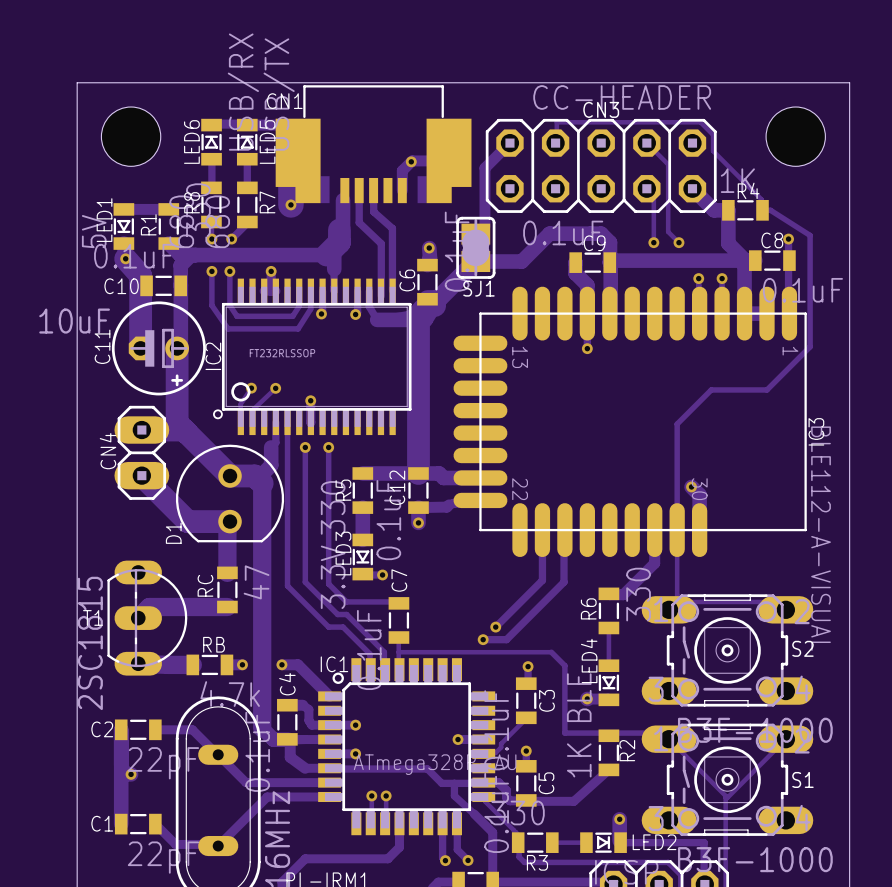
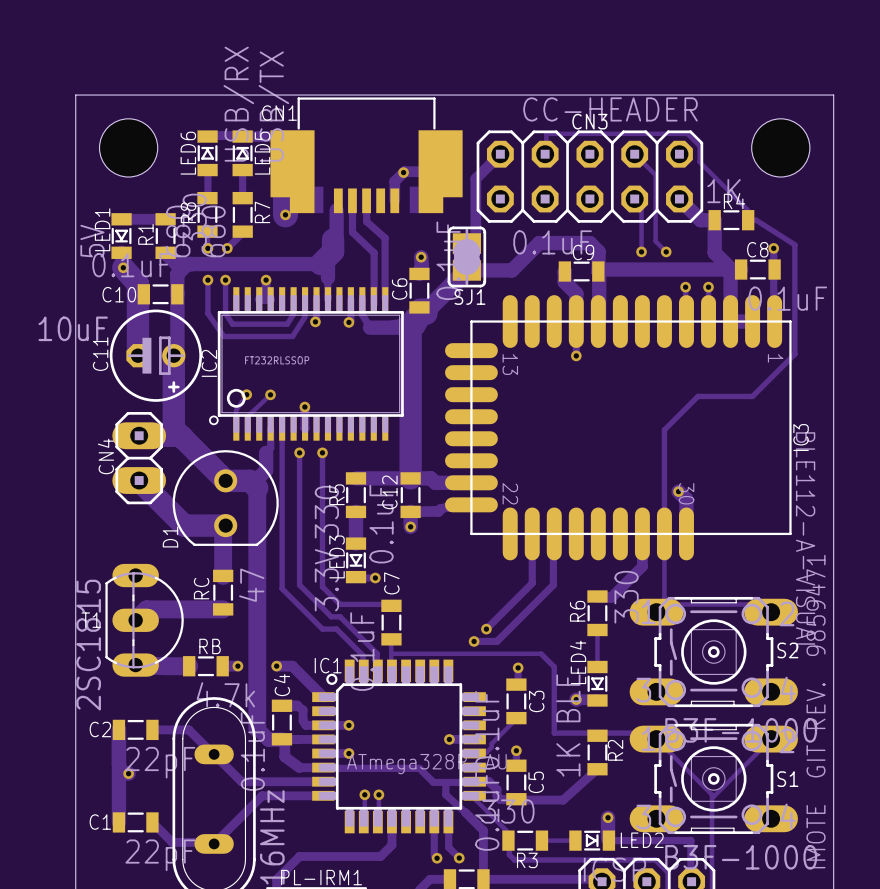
drawing: none -> [805, 554, 826, 778]
text: none -> IMOTE (816, 836)

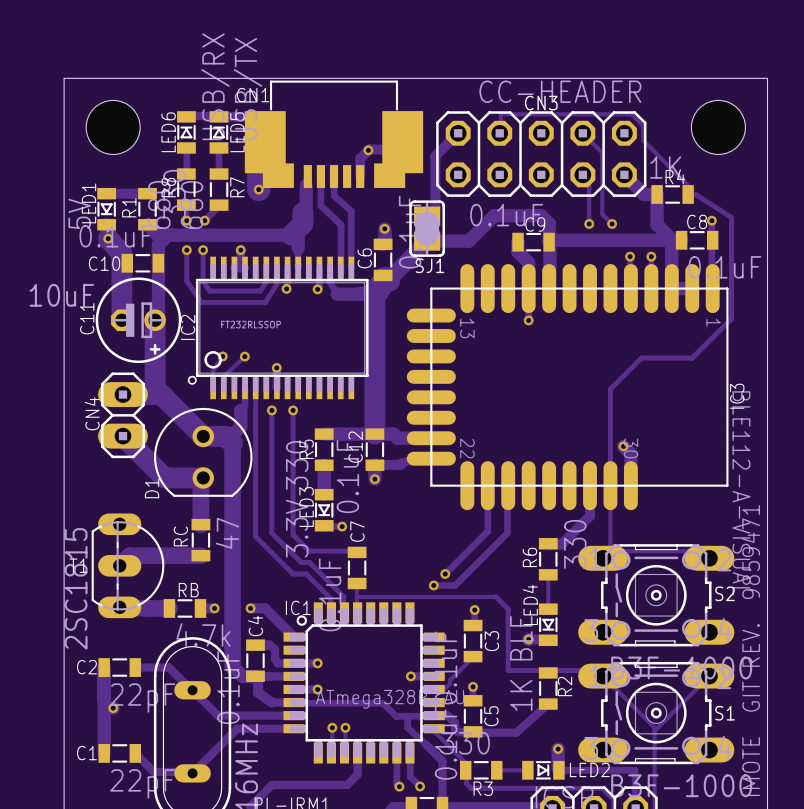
CN1 footprint: [270, 97, 463, 214] -> [244, 80, 424, 188]

